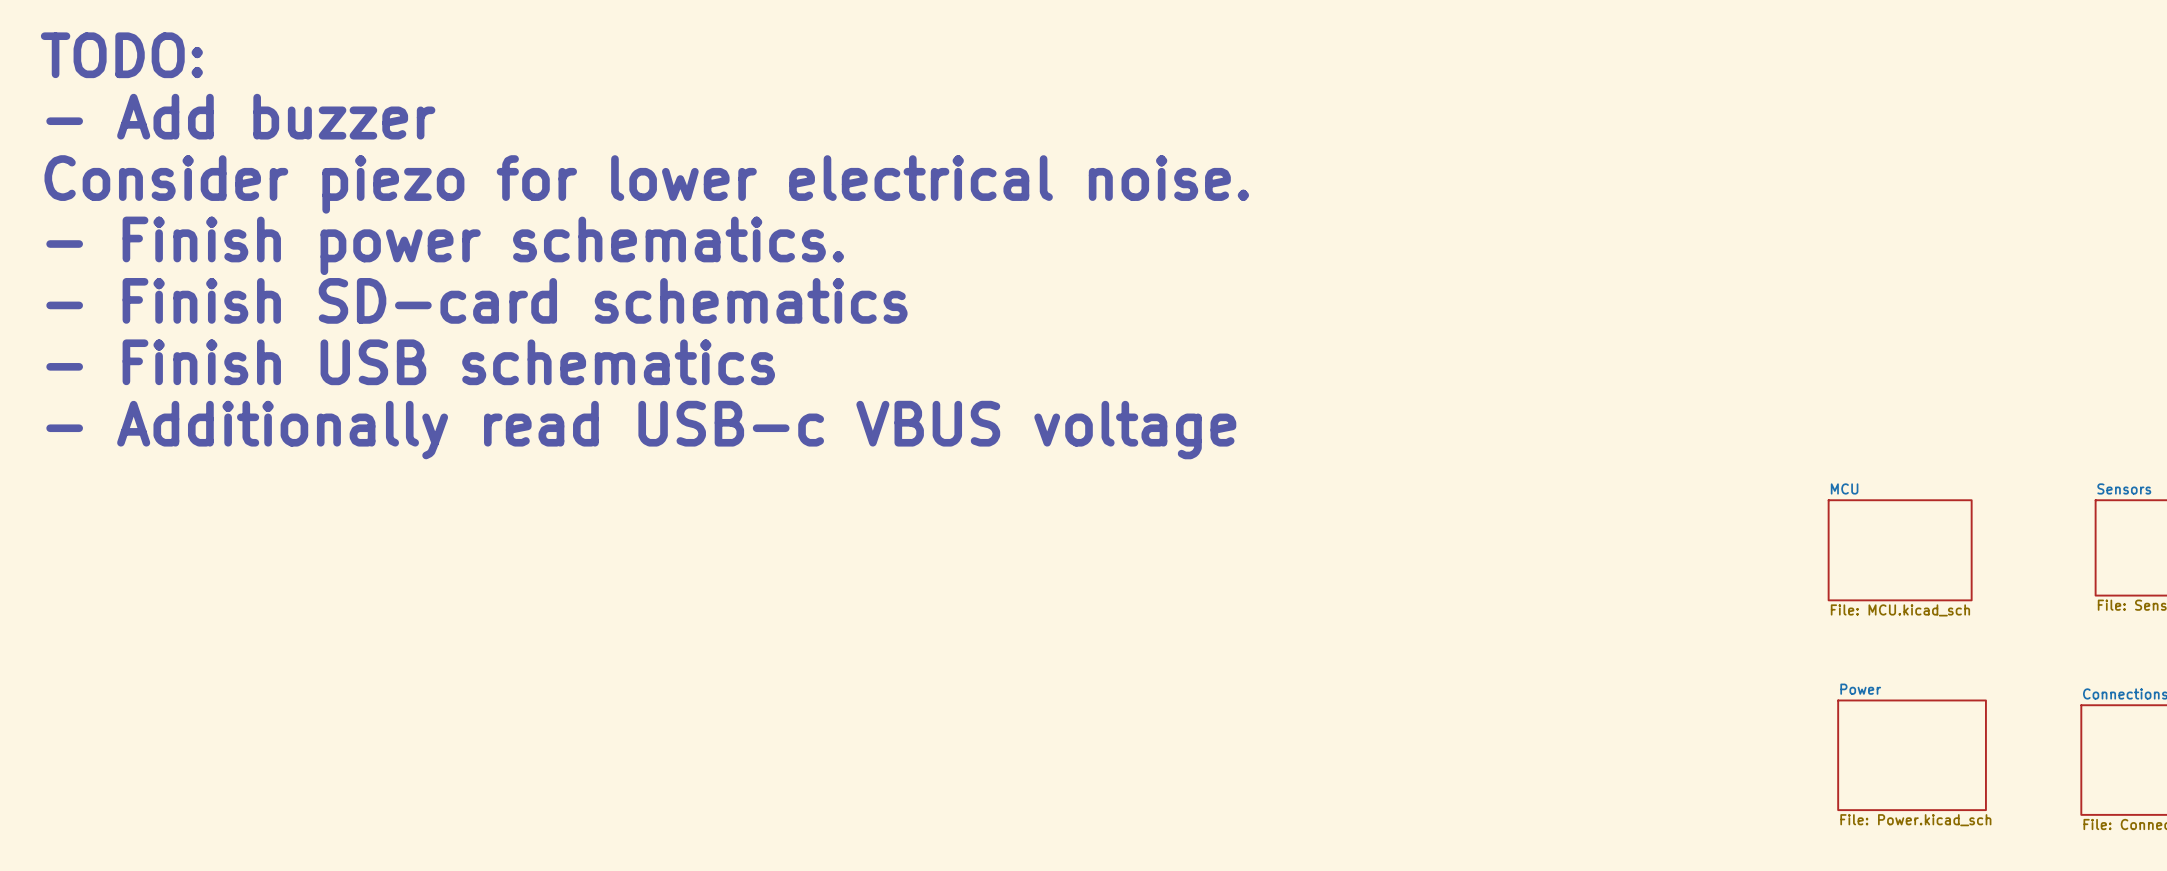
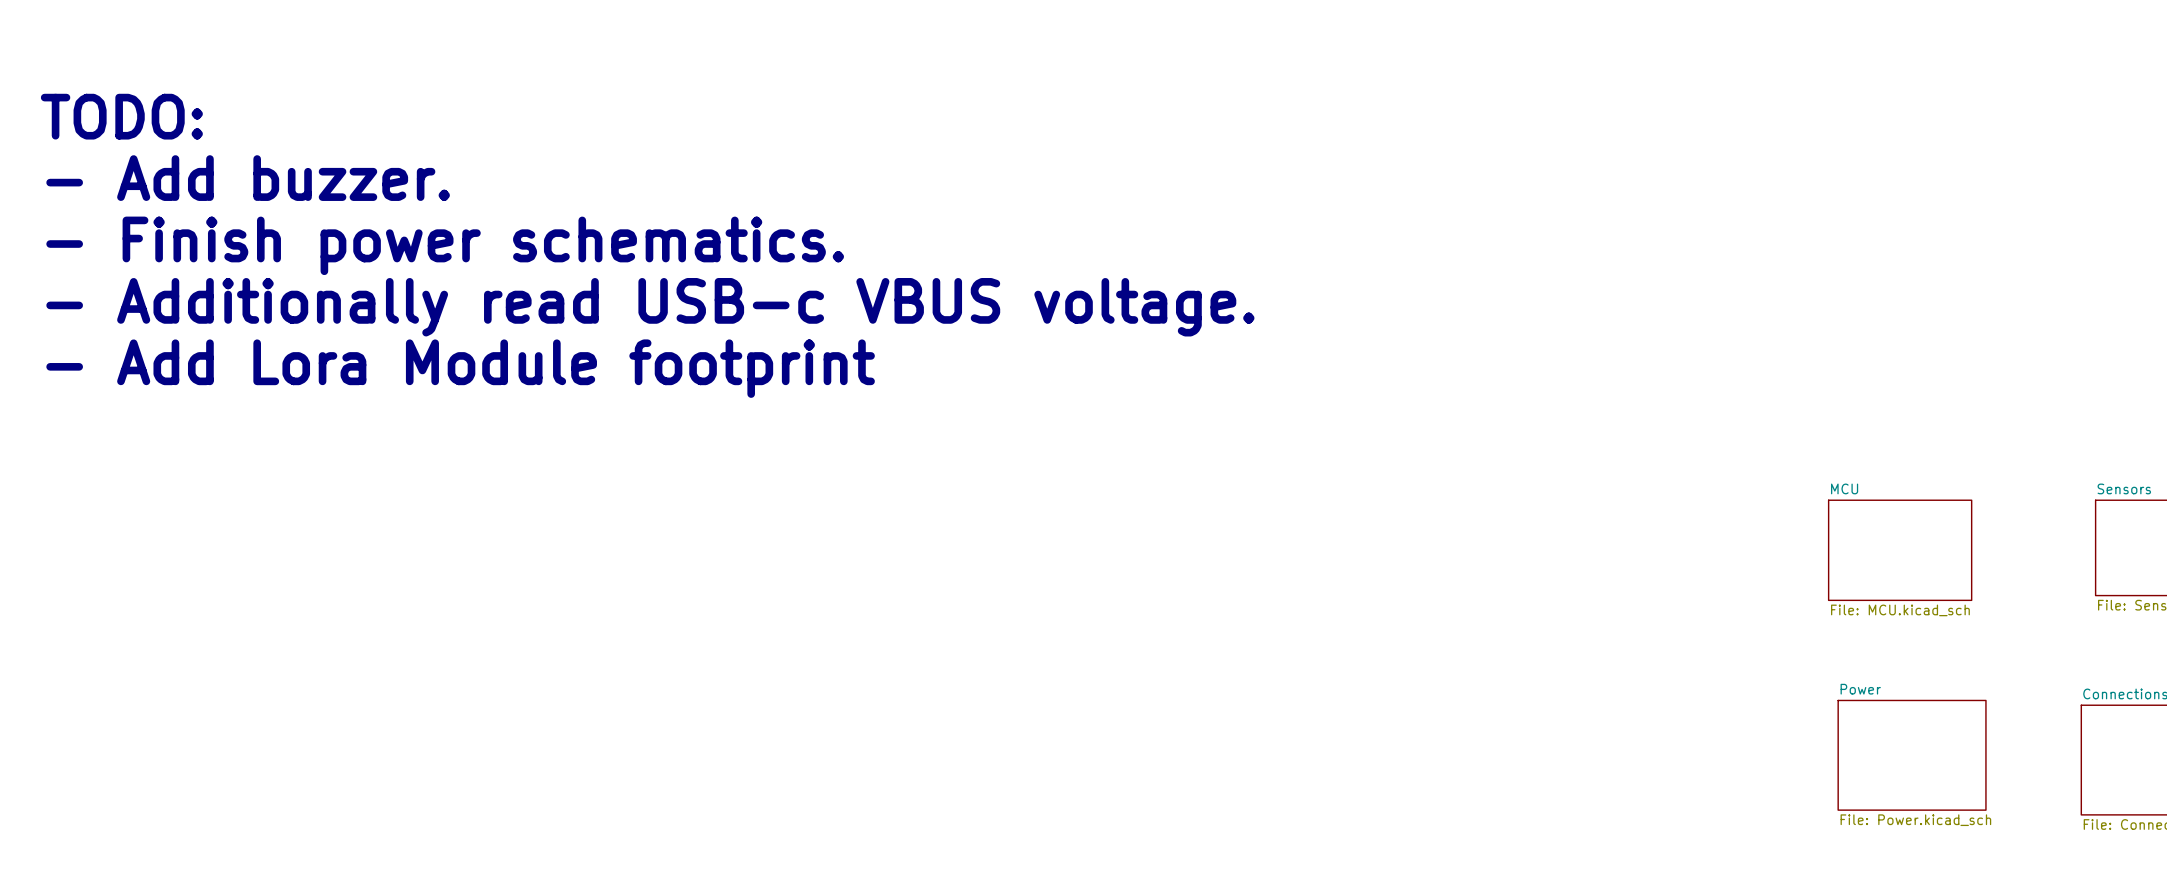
text: TODO: (121, 55) -> none
text: - Add buzzer (240, 116) -> TODO: (121, 116)
text: Consider piezo for lower electrical noise. (646, 184) -> - Add buzzer. (248, 178)
text: - Finish SD-card schematics (476, 300) -> - Additionally read USB-c VBUS voltage. (650, 307)
text: - Finish USB schematics (410, 362) -> - Add Lora Module footprint (460, 368)
text: - Additionally read USB-c VBUS voltage (641, 430) -> none

